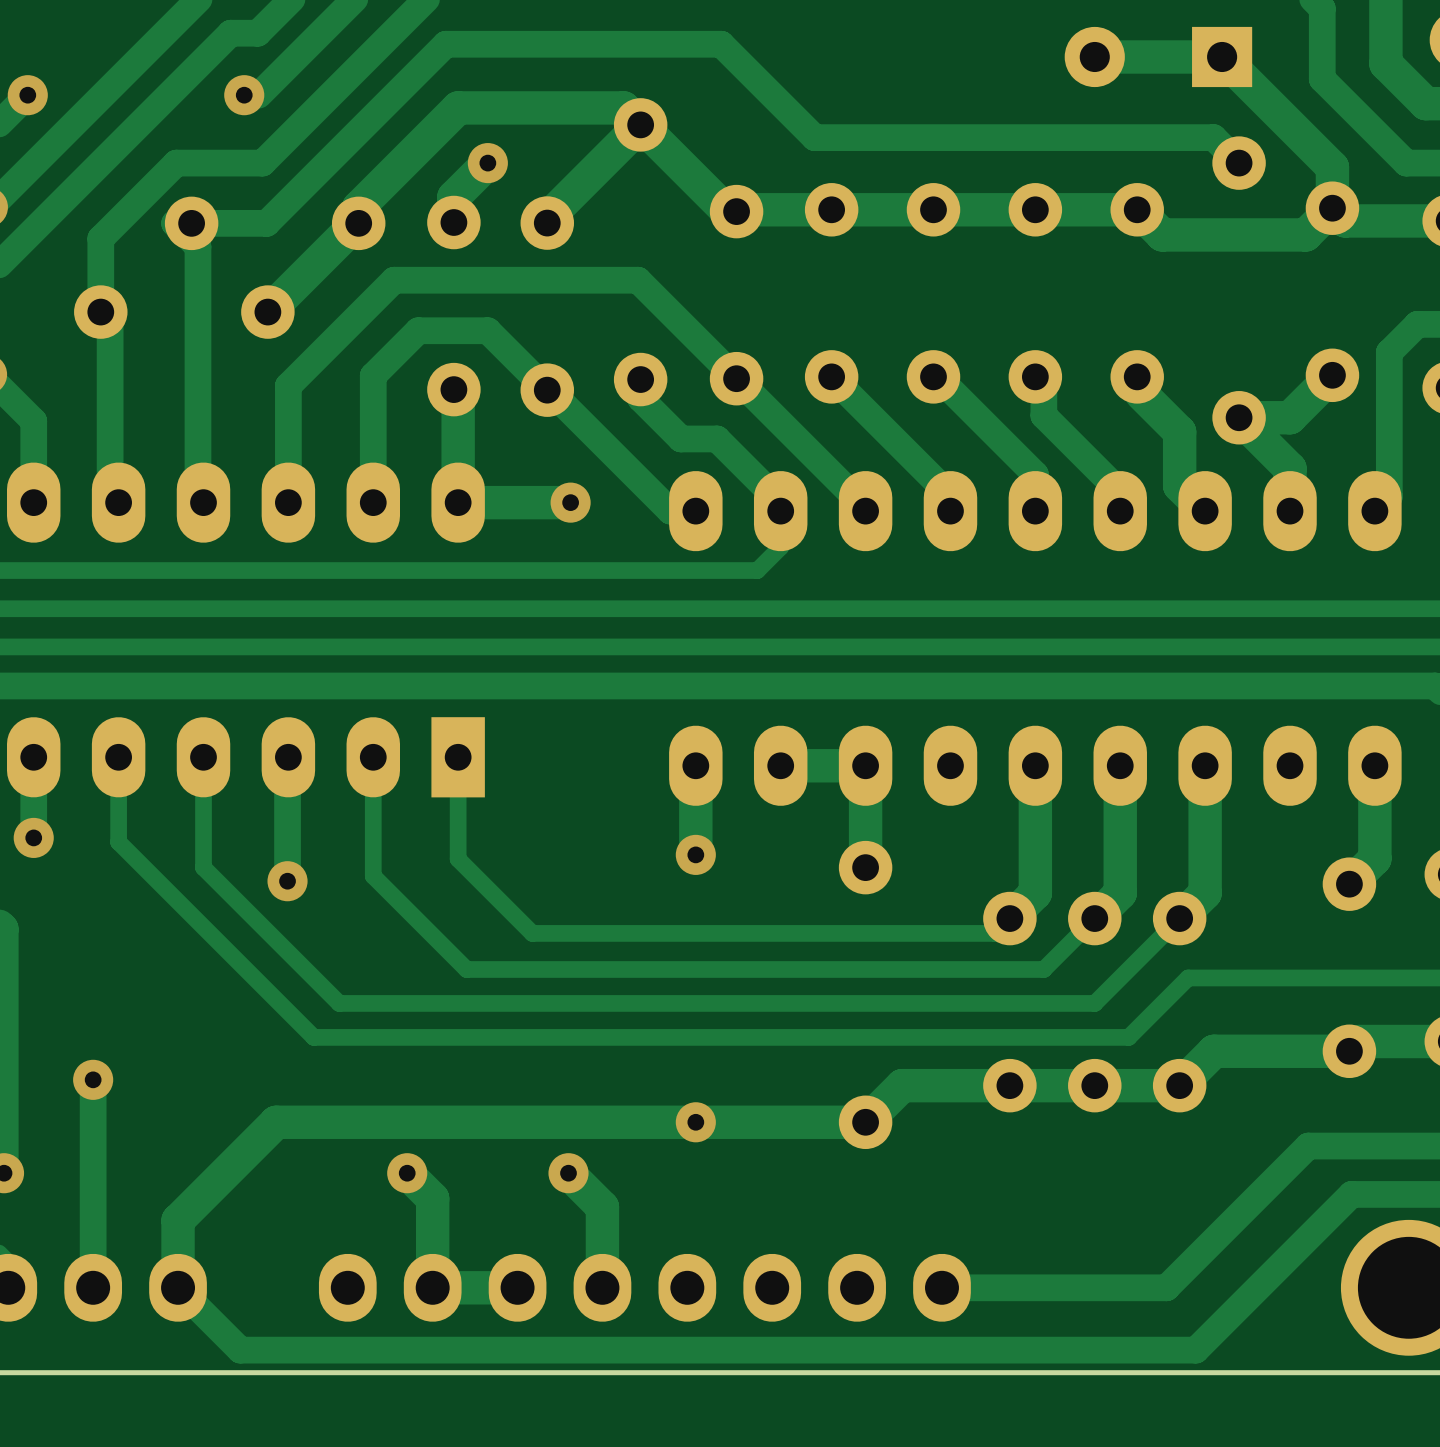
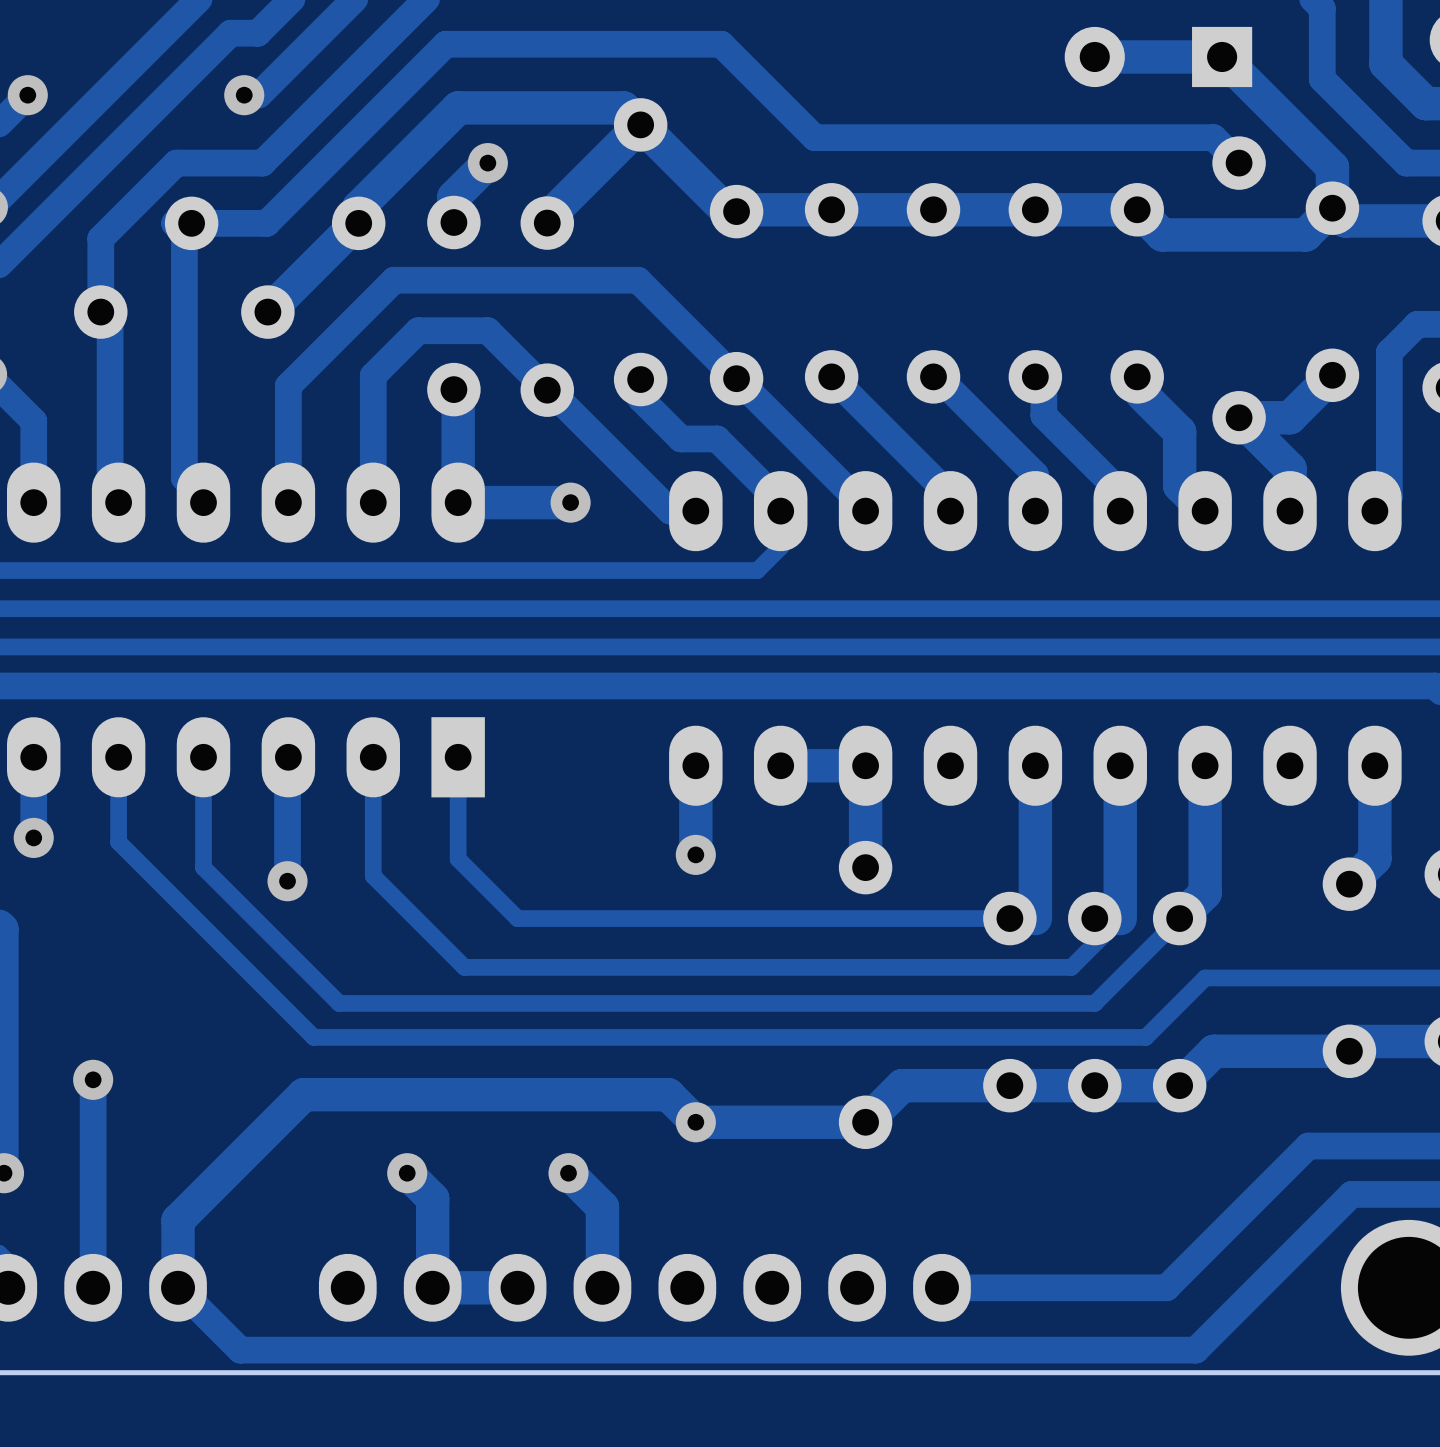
track: (184, 233) (197, 246) (197, 491) -> (184, 233) (184, 478) (197, 491)
track: (1035, 893) (995, 933) (532, 933) (517, 918) -> (1035, 893) (1035, 918) (517, 918)
track: (1120, 893) (1043, 969) (466, 969) (464, 967) -> (1120, 893) (1120, 918) (1071, 967) (464, 967)
track: (1205, 977) (1188, 977) (1128, 1037) -> (1205, 977) (1145, 1037) (1128, 1037)
track: (695, 1122) (276, 1122) -> (695, 1122) (668, 1094) (303, 1094) (276, 1122)

